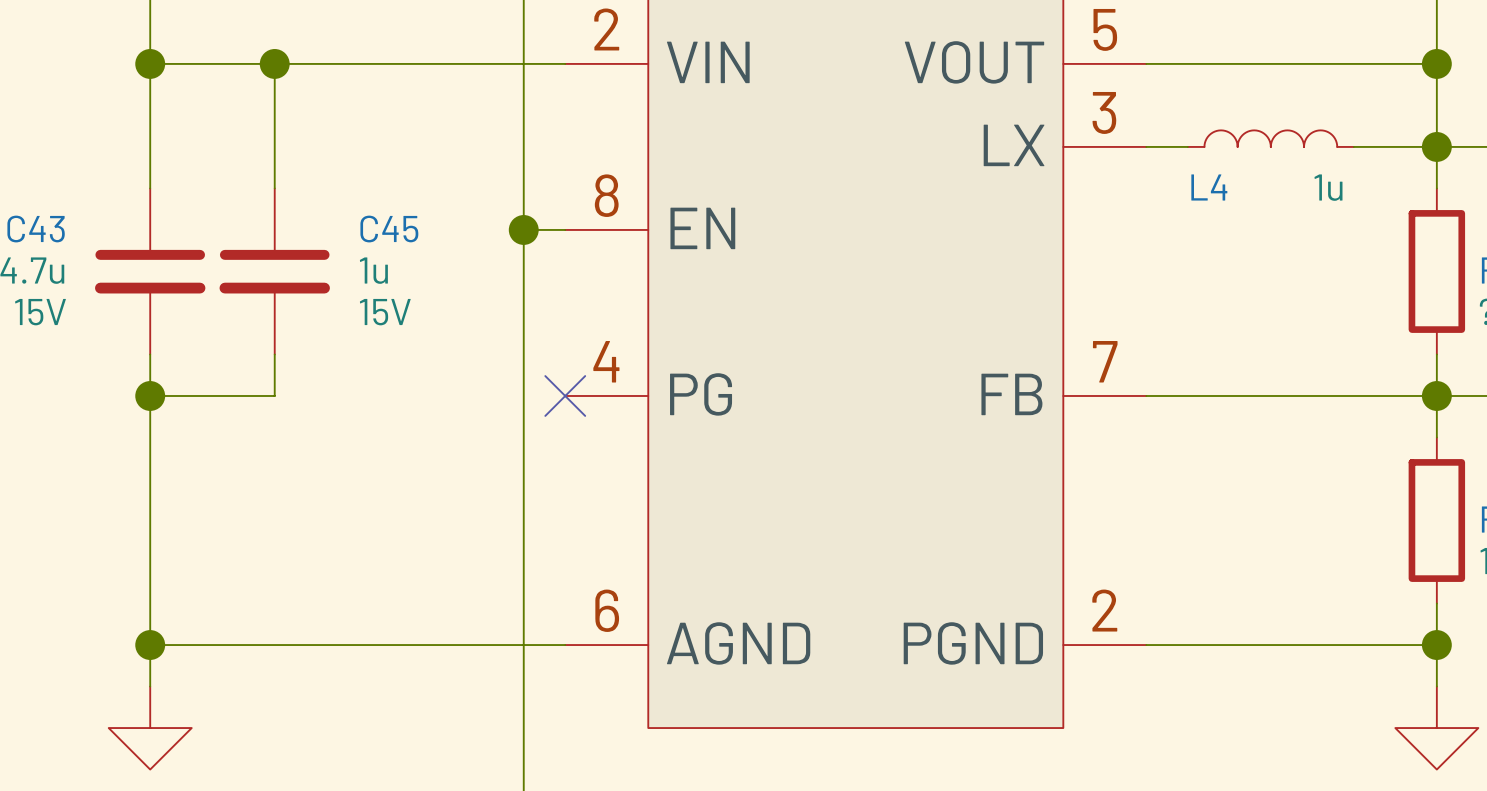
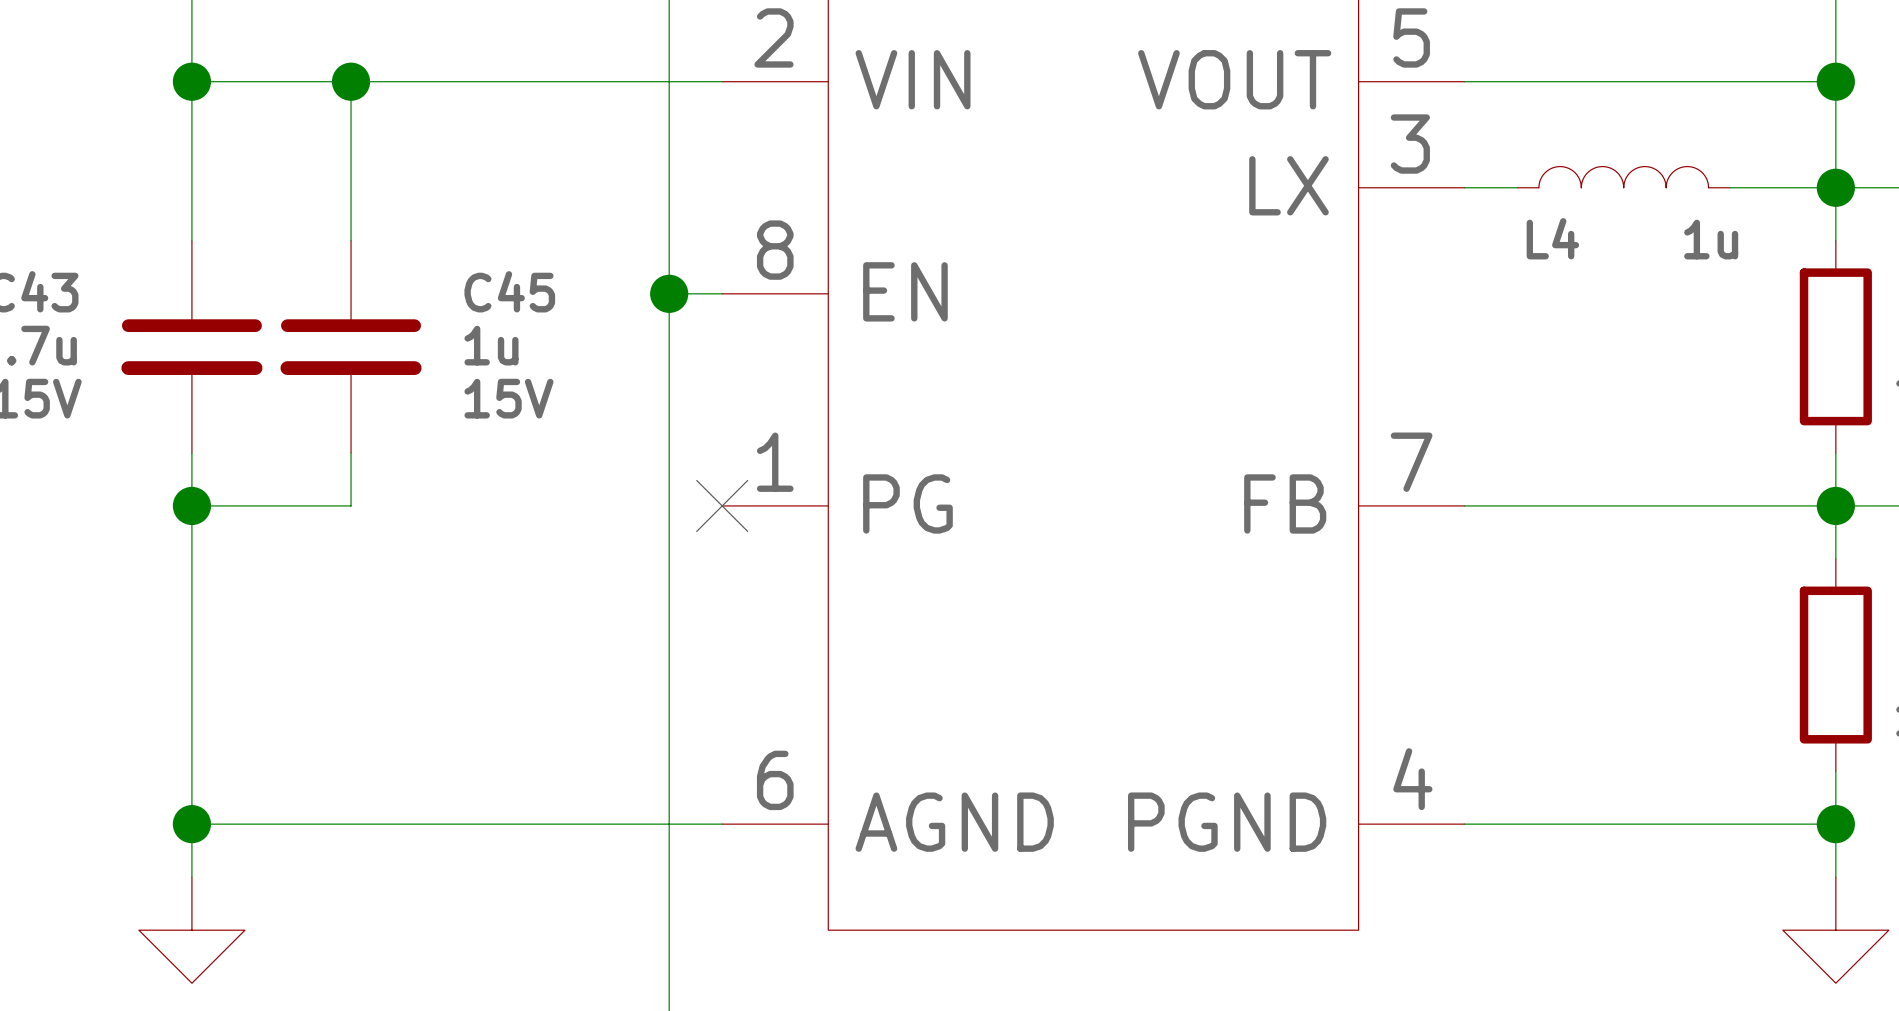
part pin number: 4 (606, 361) -> 1 (775, 462)
part pin number: 2 (1104, 610) -> 4 (1412, 779)

